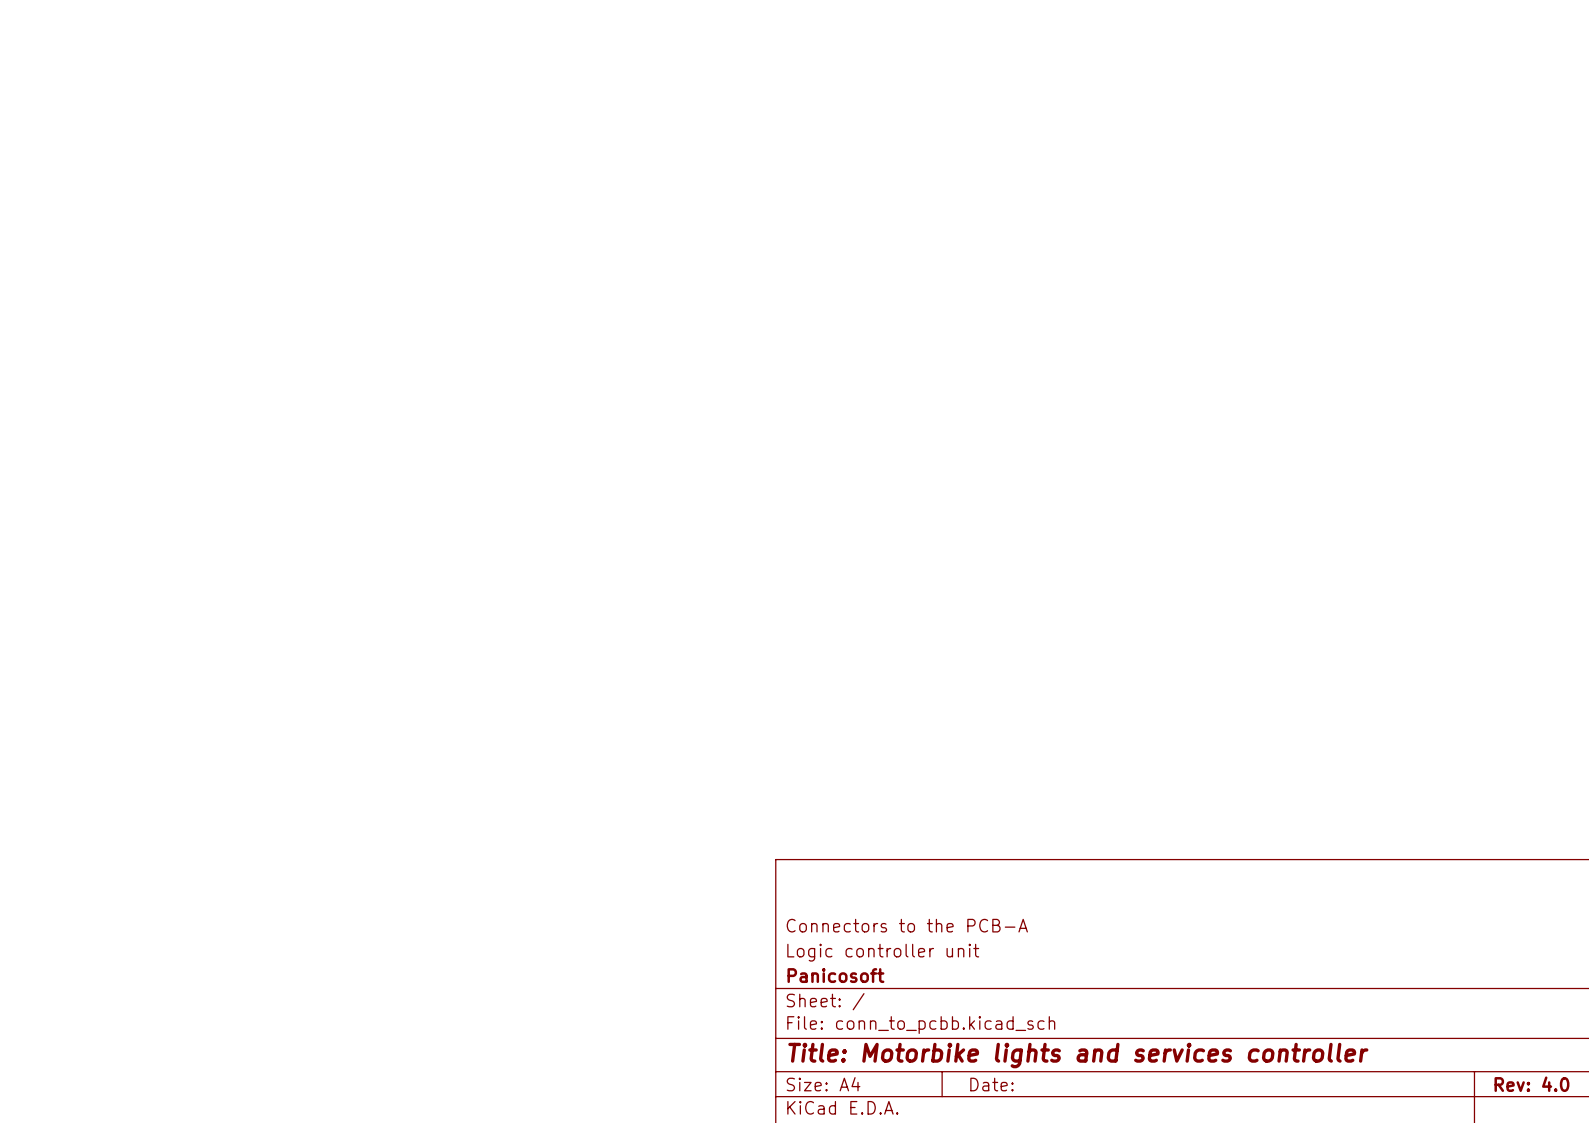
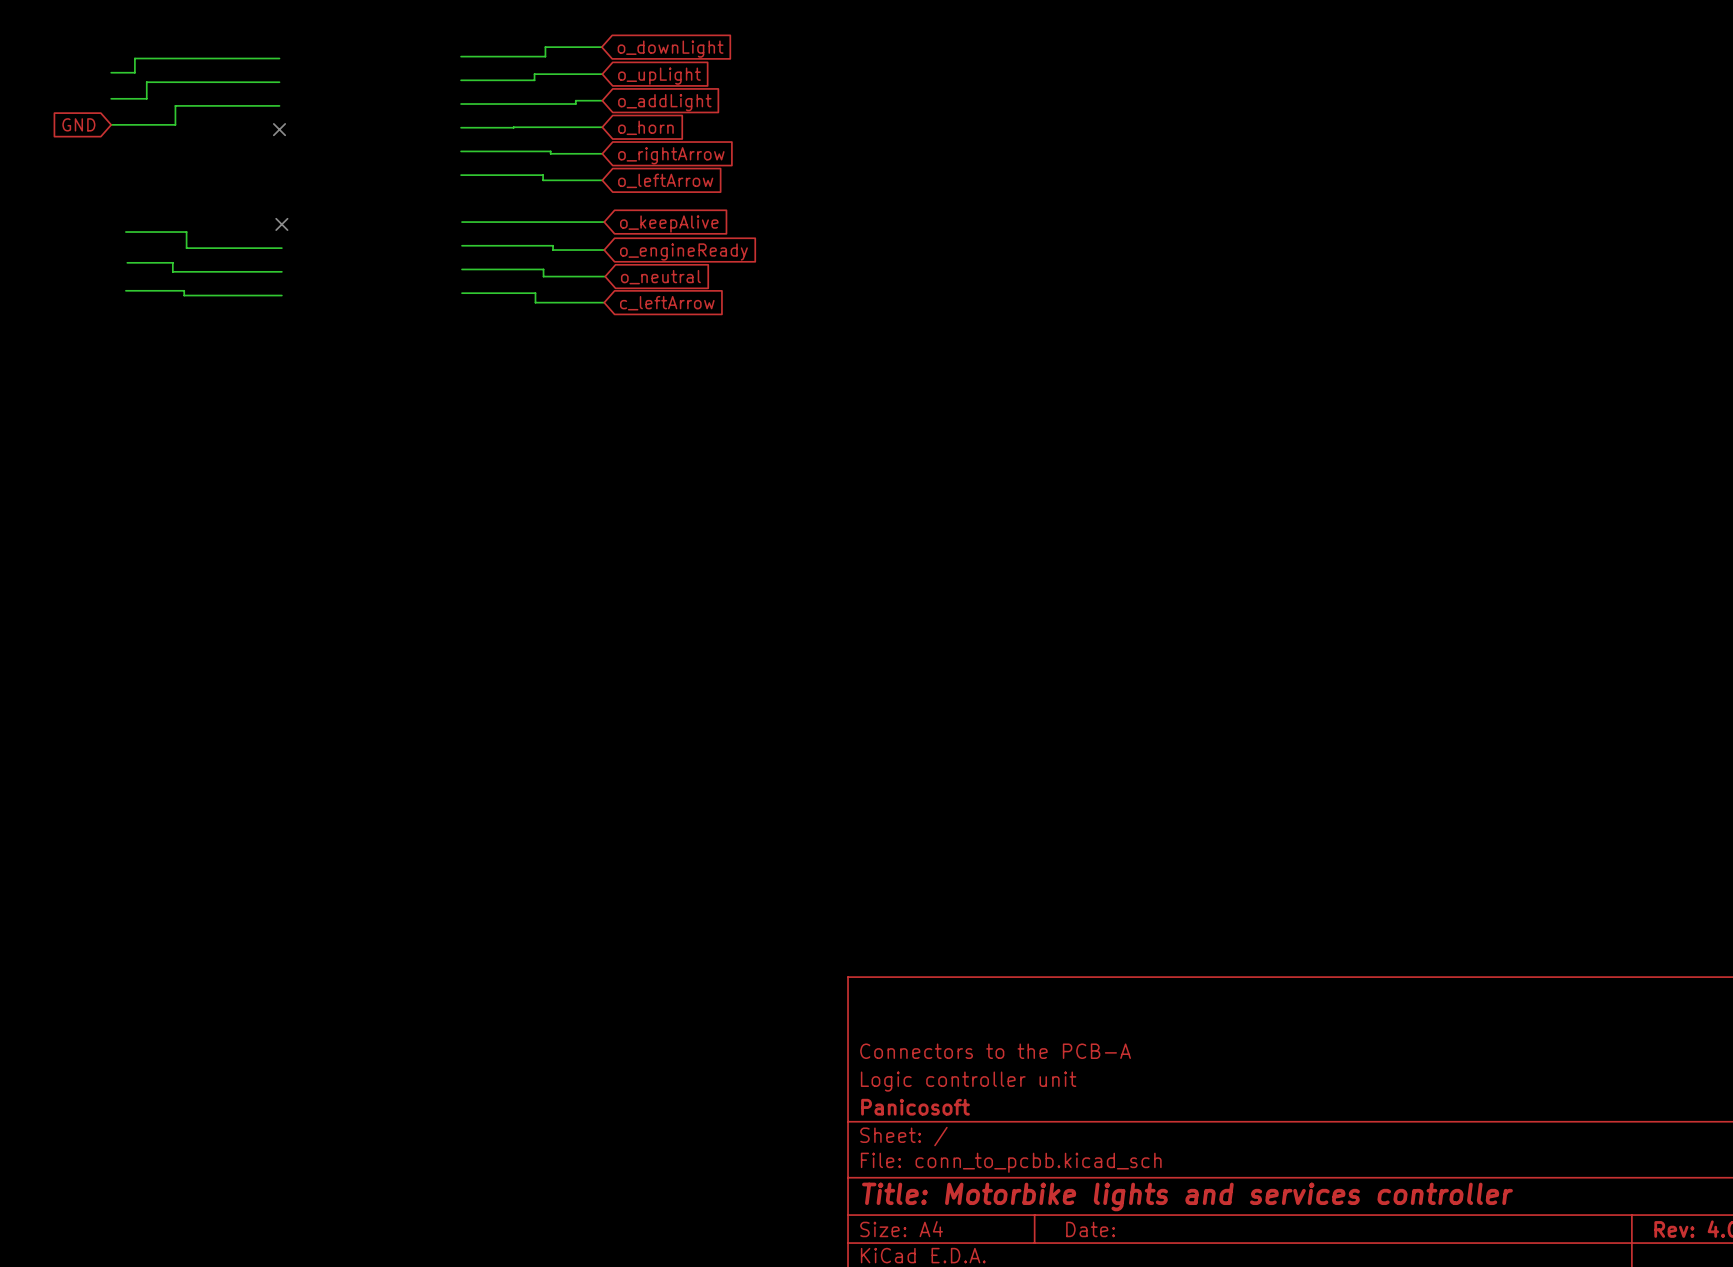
wire: none -> (601, 47) (545, 47) (545, 56) (461, 56)
global label: none -> o_downLight (670, 49)
wire: none -> (279, 58) (134, 58) (134, 72) (111, 72)
wire: none -> (602, 74) (534, 74) (534, 80) (461, 80)
global label: none -> o_upLight (659, 76)
wire: none -> (279, 82) (146, 82) (146, 98) (111, 98)
wire: none -> (602, 100) (575, 100) (575, 104) (461, 104)
global label: none -> o_addLight (664, 102)
wire: none -> (279, 105) (175, 105) (175, 124) (111, 124)
global label: none -> GND (78, 124)
wire: none -> (602, 127) (461, 127)
global label: none -> o_horn (645, 127)
no-connect mark: none -> (279, 129)
wire: none -> (461, 151) (550, 151) (550, 153) (602, 153)
global label: none -> o_rightArrow (671, 155)
wire: none -> (461, 175) (543, 175) (543, 180) (602, 180)
global label: none -> o_leftArrow (665, 180)
wire: none -> (462, 222) (604, 222)
no-connect mark: none -> (281, 224)
global label: none -> o_keepAlive (669, 224)
wire: none -> (125, 232) (186, 232) (186, 248) (281, 248)
wire: none -> (462, 245) (553, 245) (553, 250) (604, 250)
global label: none -> o_engineReady (683, 252)
wire: none -> (127, 262) (172, 262) (172, 271) (281, 271)
wire: none -> (462, 269) (543, 269) (543, 276) (605, 276)
global label: none -> o_neutral (660, 277)
wire: none -> (125, 290) (184, 290) (184, 295) (281, 295)
wire: none -> (462, 293) (535, 293) (535, 302) (604, 302)
global label: none -> c_leftArrow (667, 303)

